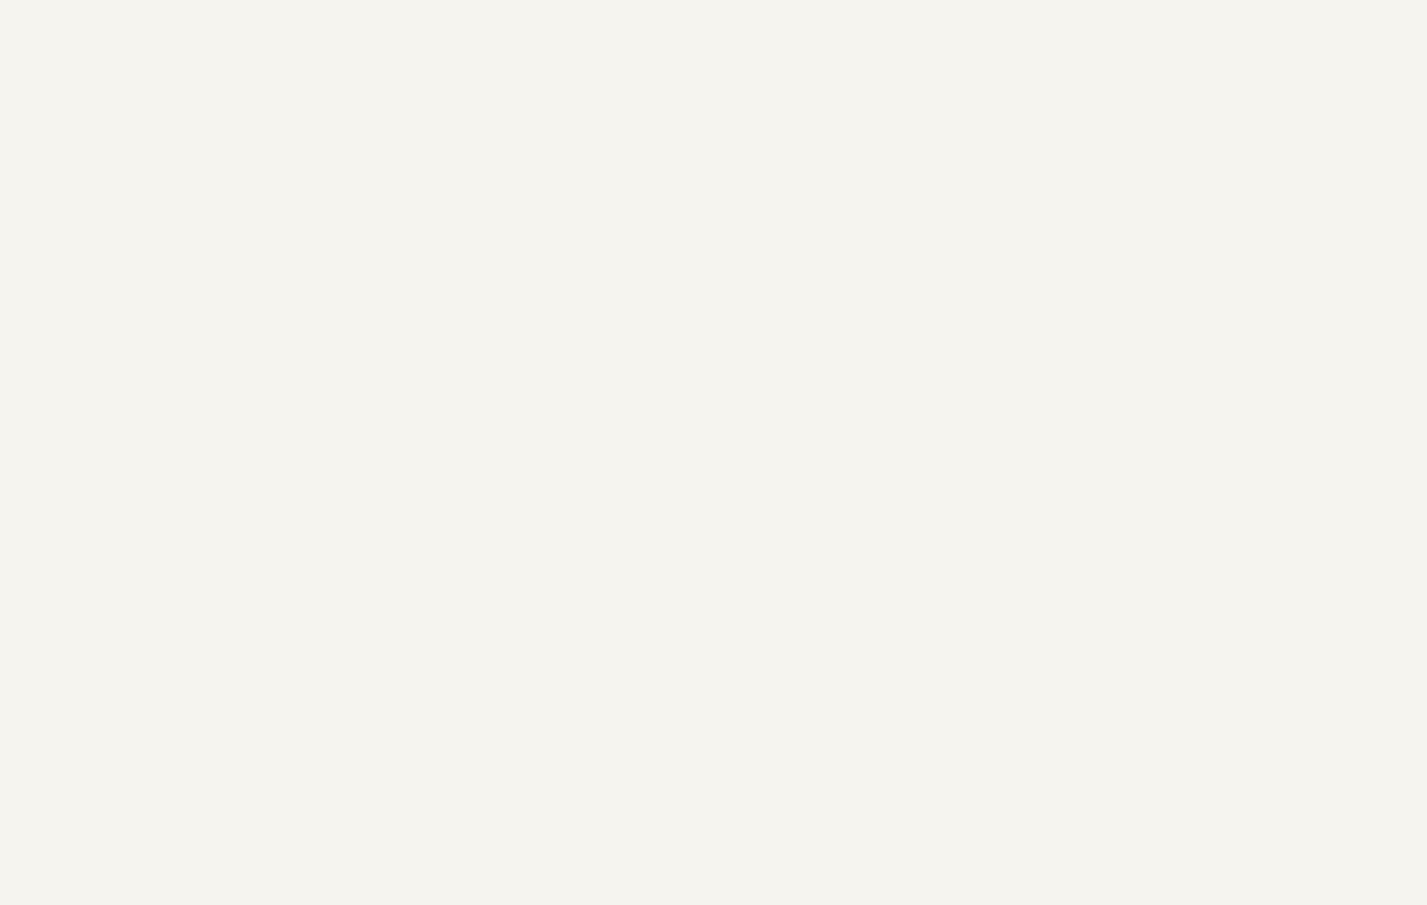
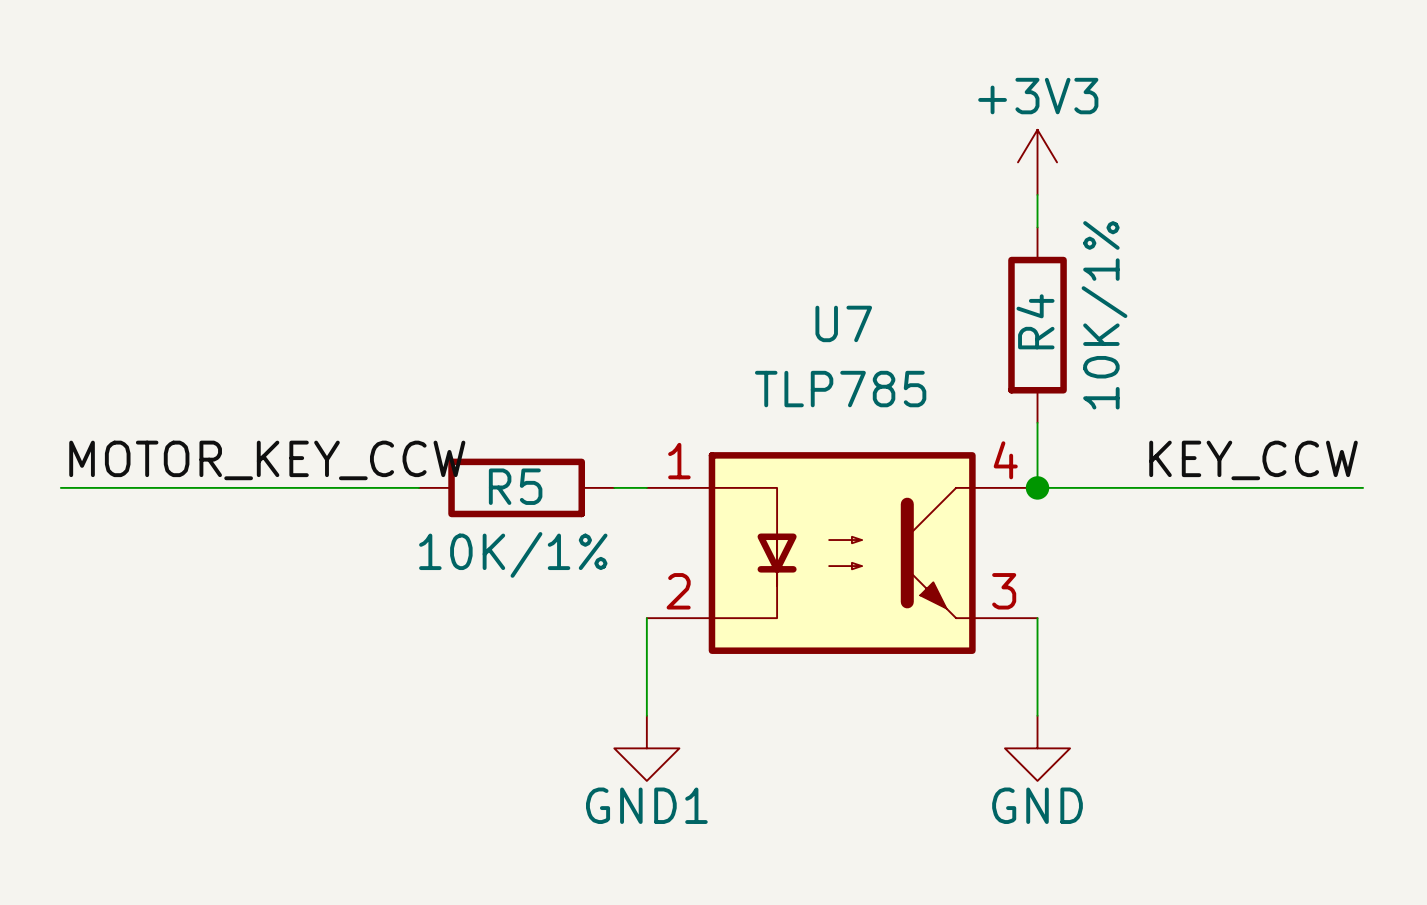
power symbol: none -> +3V3 (1037, 162)
wire: none -> (1037, 194) (1037, 227)
R4: none -> 10K/1% (1037, 325)
wire: none -> (1037, 422) (1037, 487) (1363, 487)
label: none -> MOTOR_KEY_CCW (267, 460)
label: none -> KEY_CCW (1253, 460)
wire: none -> (60, 487) (418, 487)
R5: none -> 10K/1% (516, 487)
wire: none -> (614, 487) (646, 487)
junction: none -> (1037, 487)
U7: none -> TLP785 (842, 553)
wire: none -> (646, 618) (646, 715)
wire: none -> (1037, 618) (1037, 715)
power symbol: none -> GND1 (646, 748)
power symbol: none -> GND (1037, 748)

